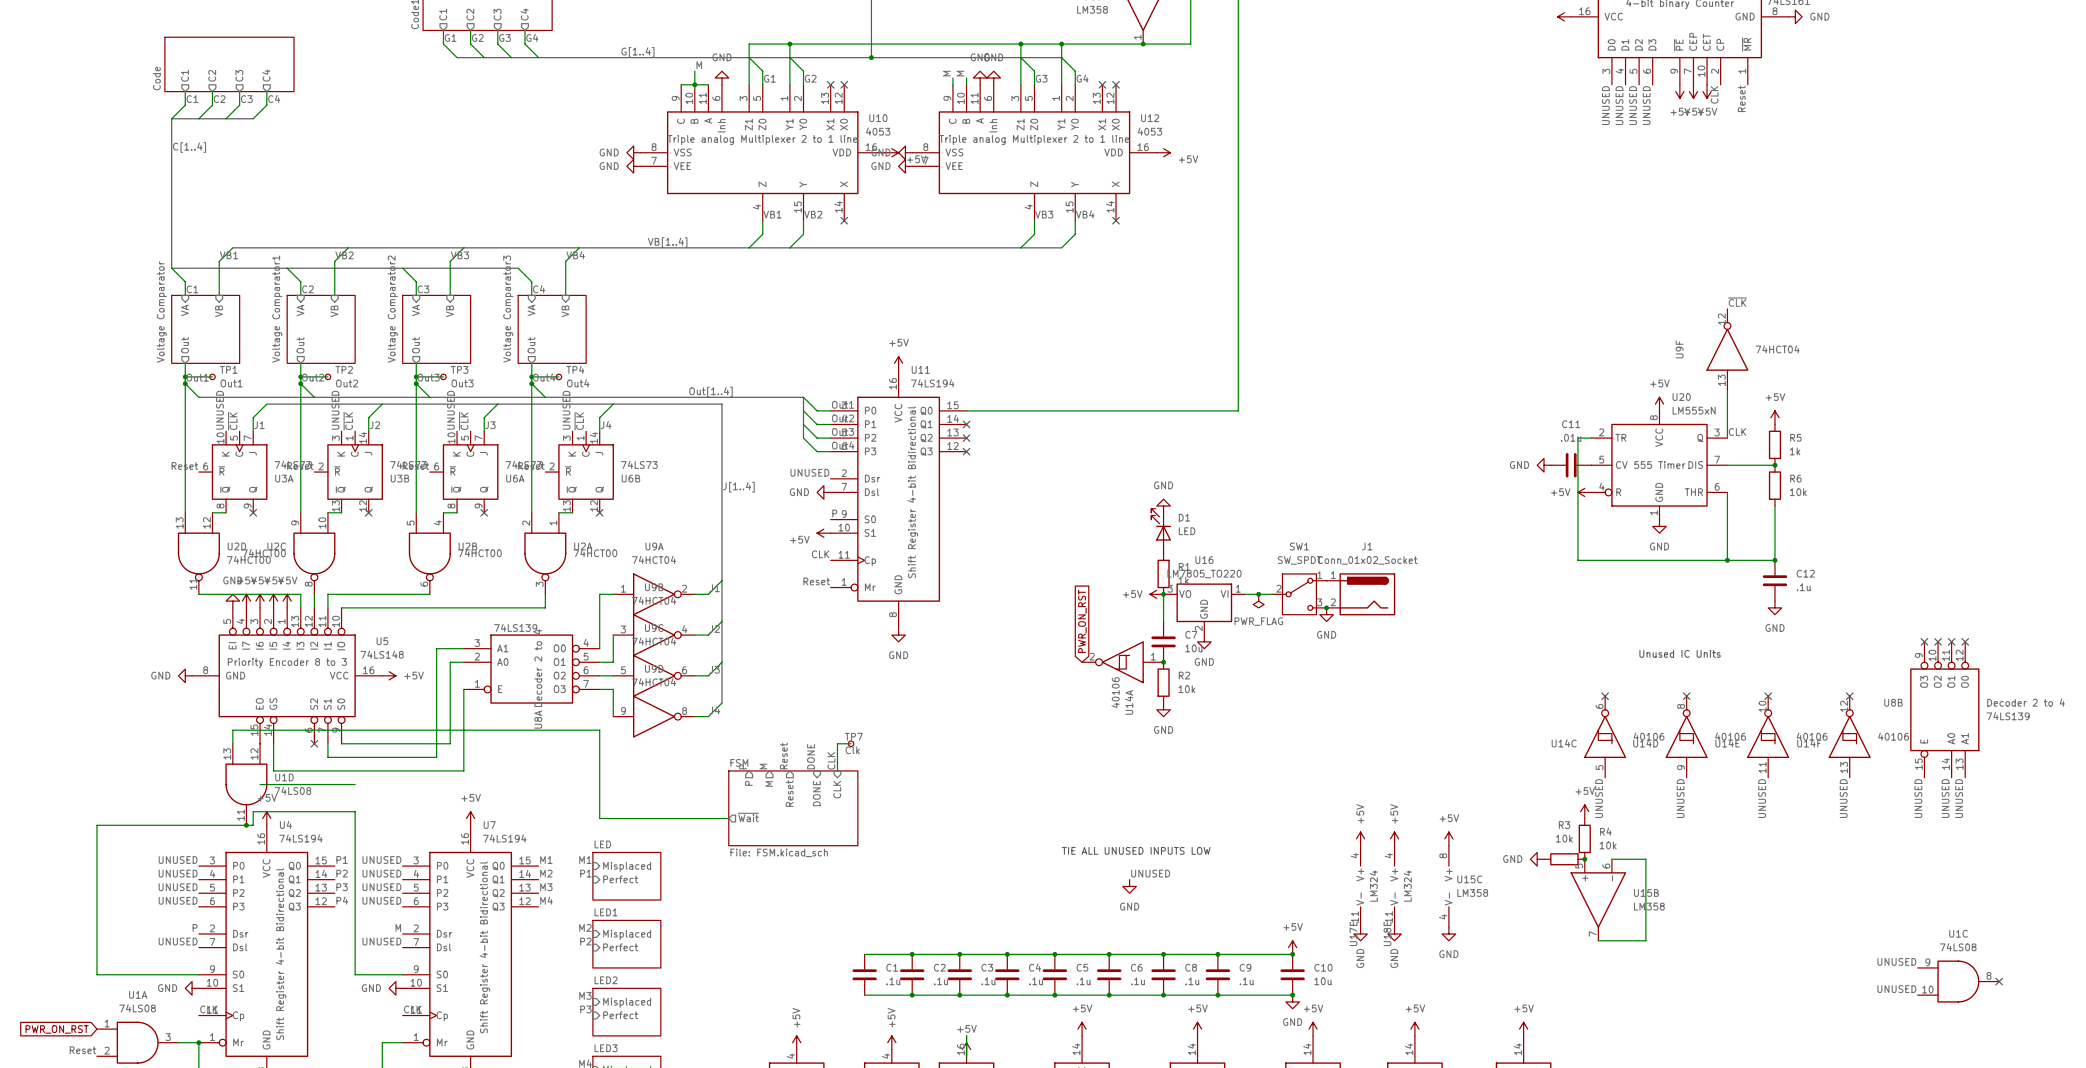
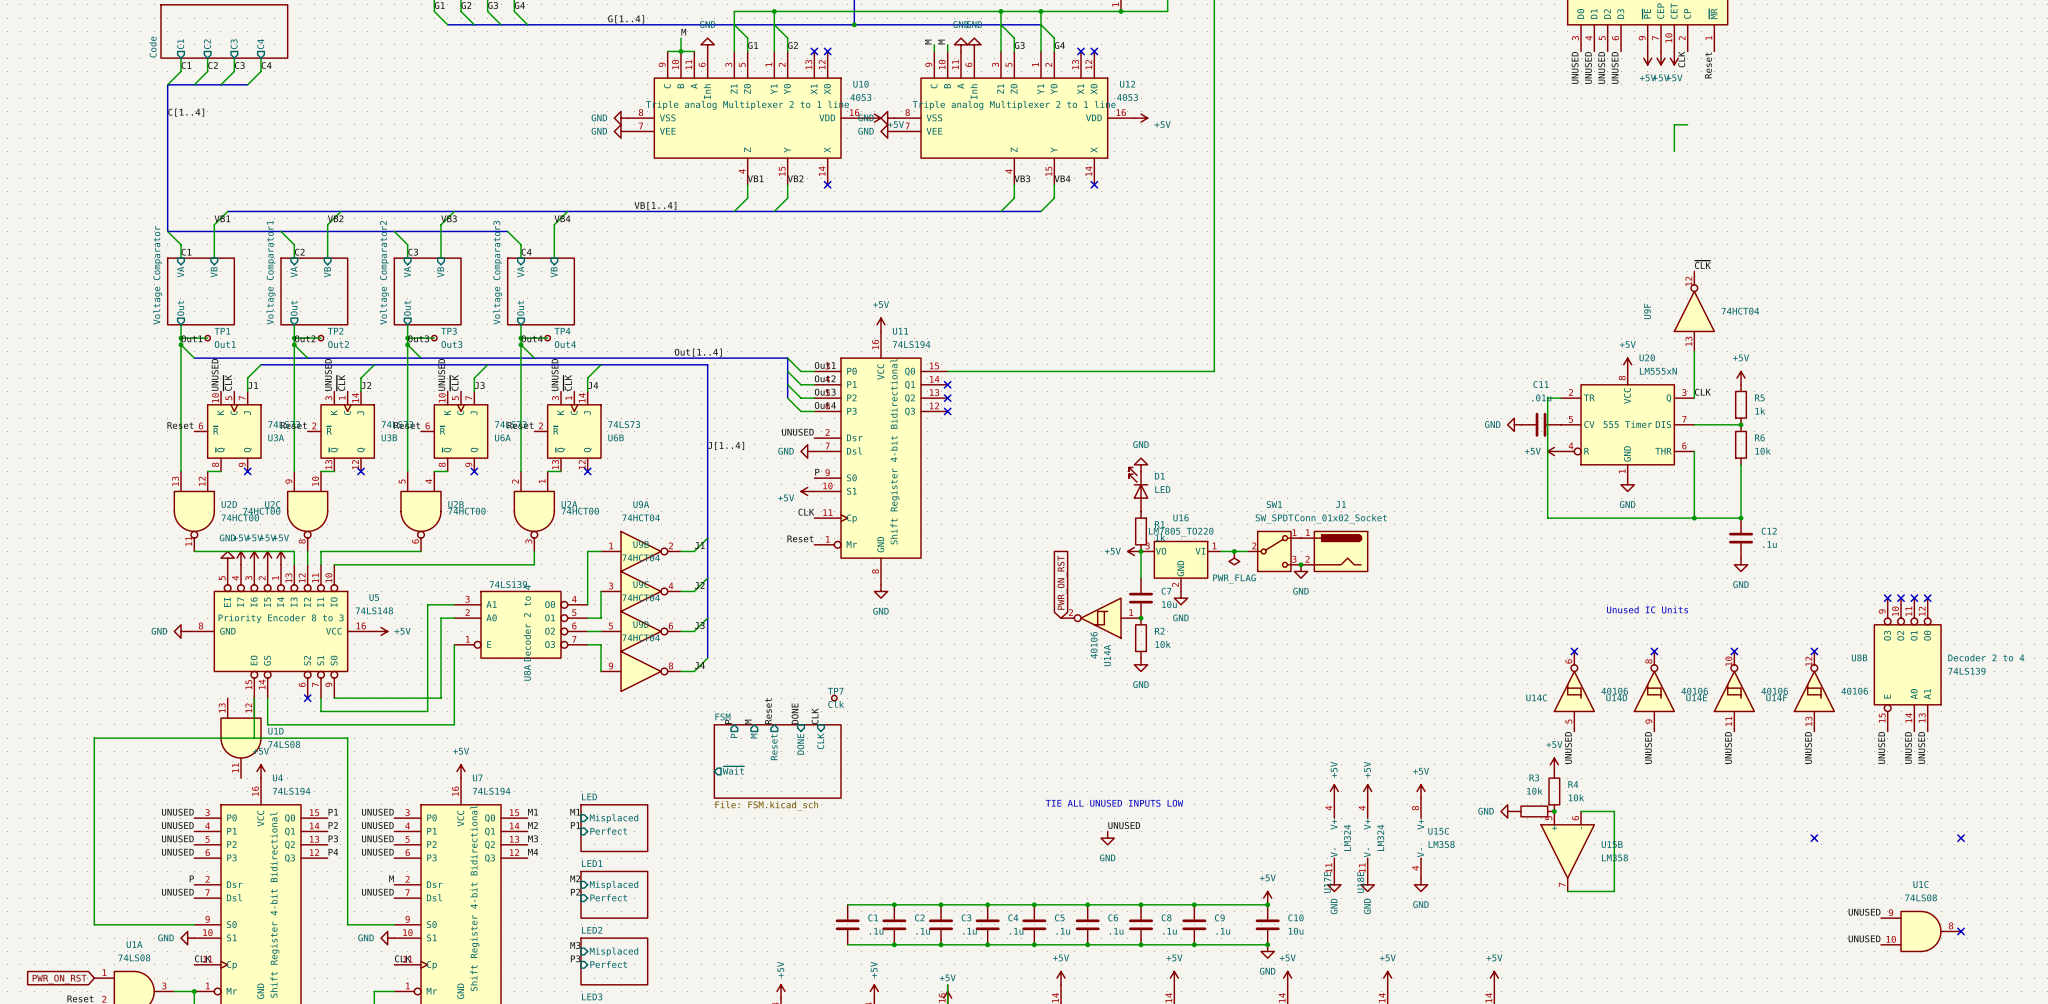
wire: none -> (1687, 124) (1674, 124) (1674, 151)
wire: (232, 743) (232, 730) (599, 730) (599, 818) (728, 818) -> none
wire: (851, 743) (837, 743) (837, 770) -> none
wire: none -> (347, 738) (347, 764)
wire: (355, 811) (253, 811) (253, 825) (96, 825) -> (254, 698) (254, 738) (94, 738) (94, 778)
junction: (246, 825) -> none
no-connect mark: none -> (1814, 838)
no-connect mark: none -> (1961, 838)

